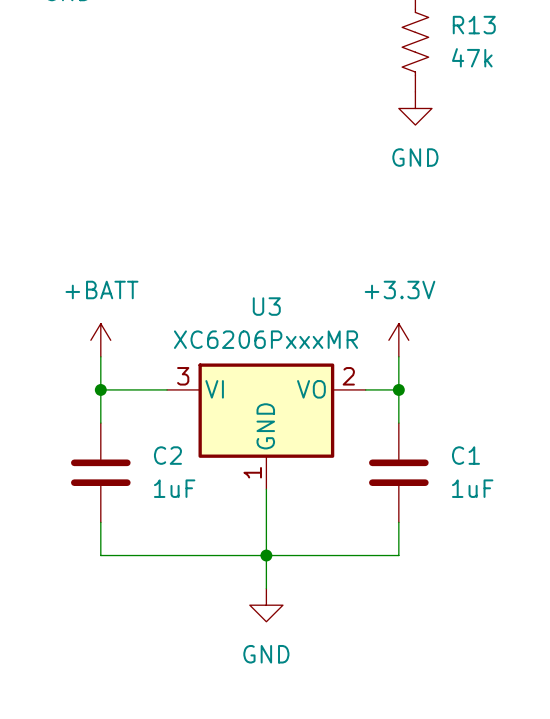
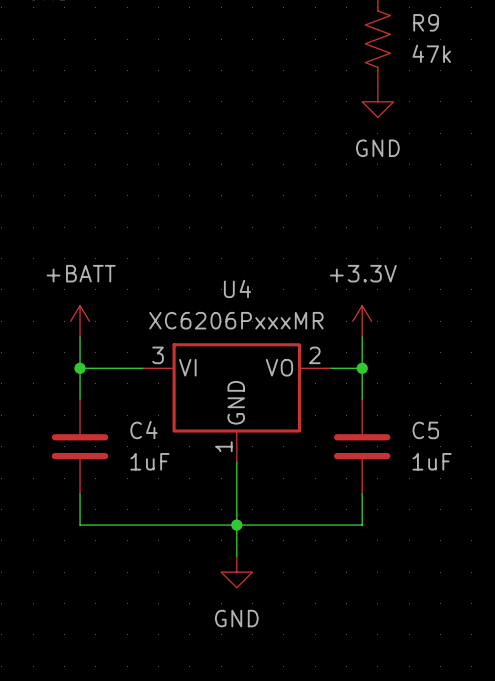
R13 name: R13 (474, 25) -> R9 (426, 22)
U3 name: U3 (266, 306) -> U4 (237, 288)
C2 name: C2 (167, 455) -> C4 (143, 430)
C1 name: C1 (465, 455) -> C5 (425, 430)

